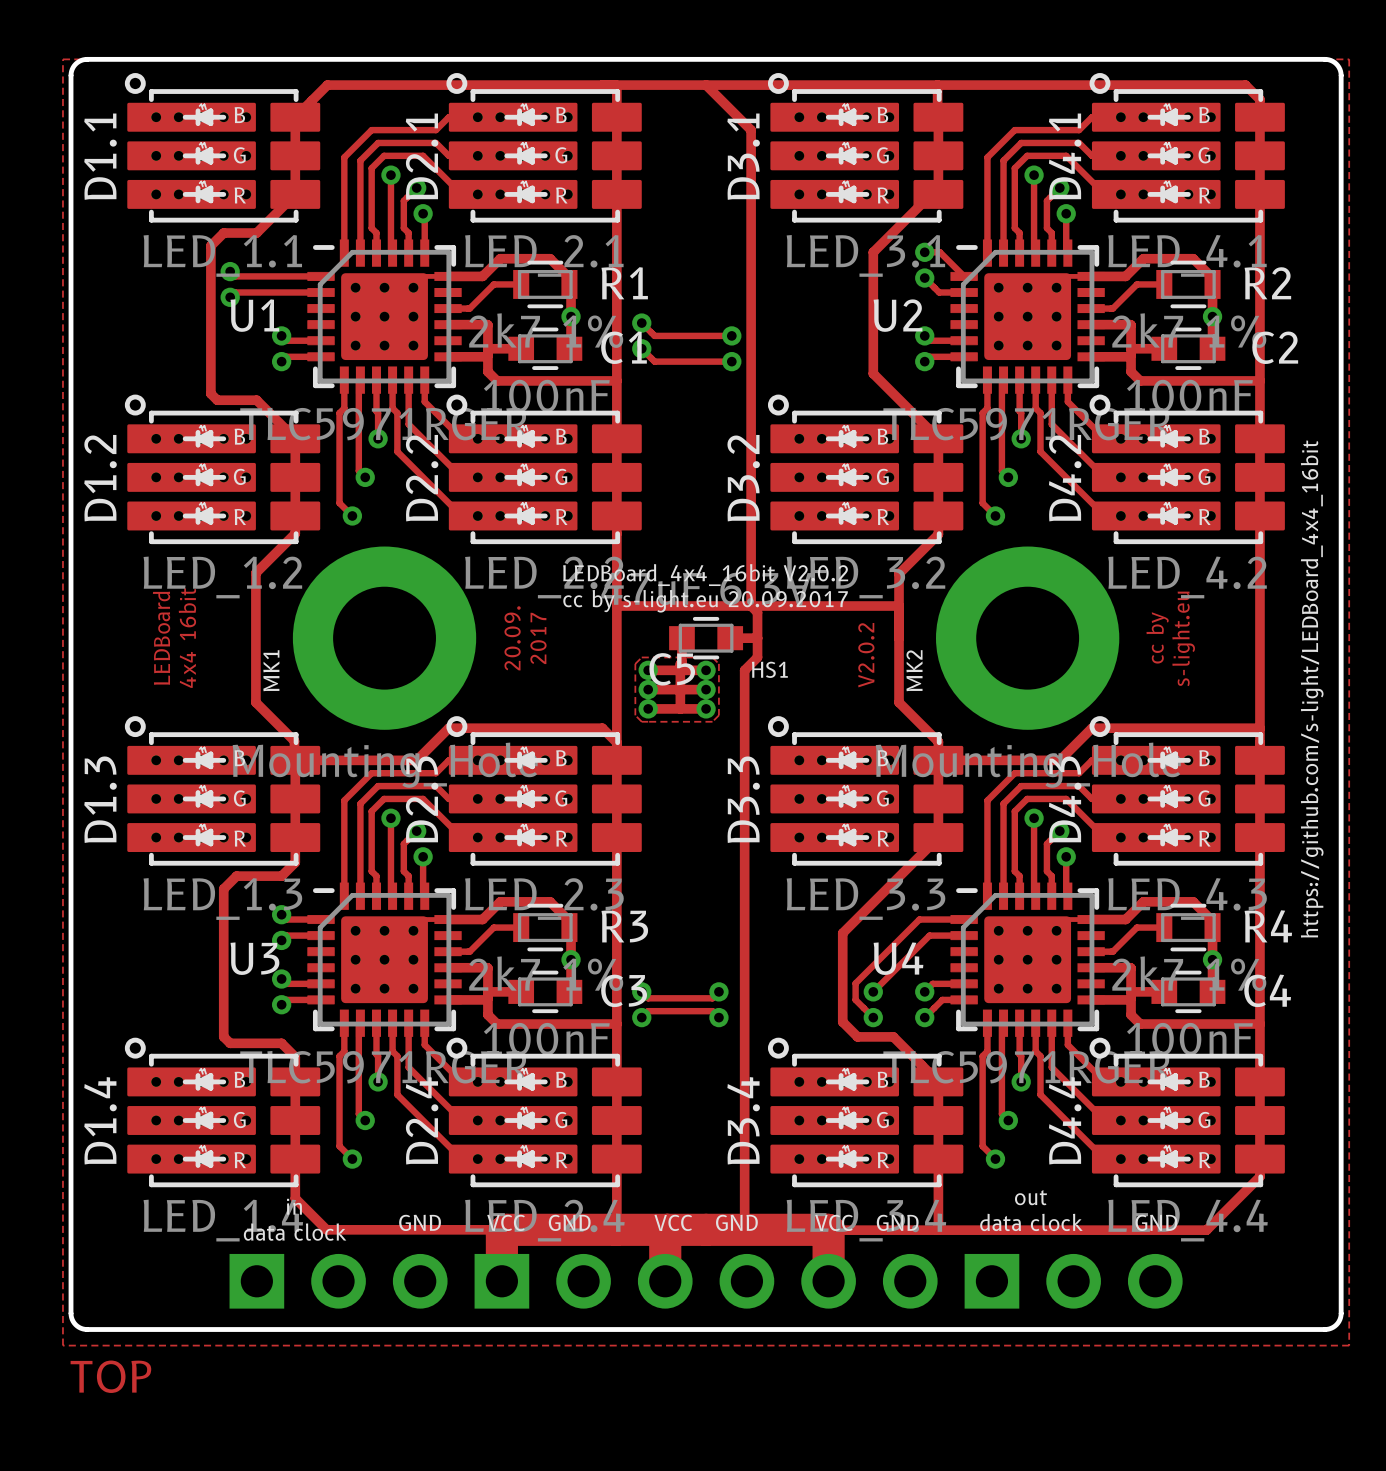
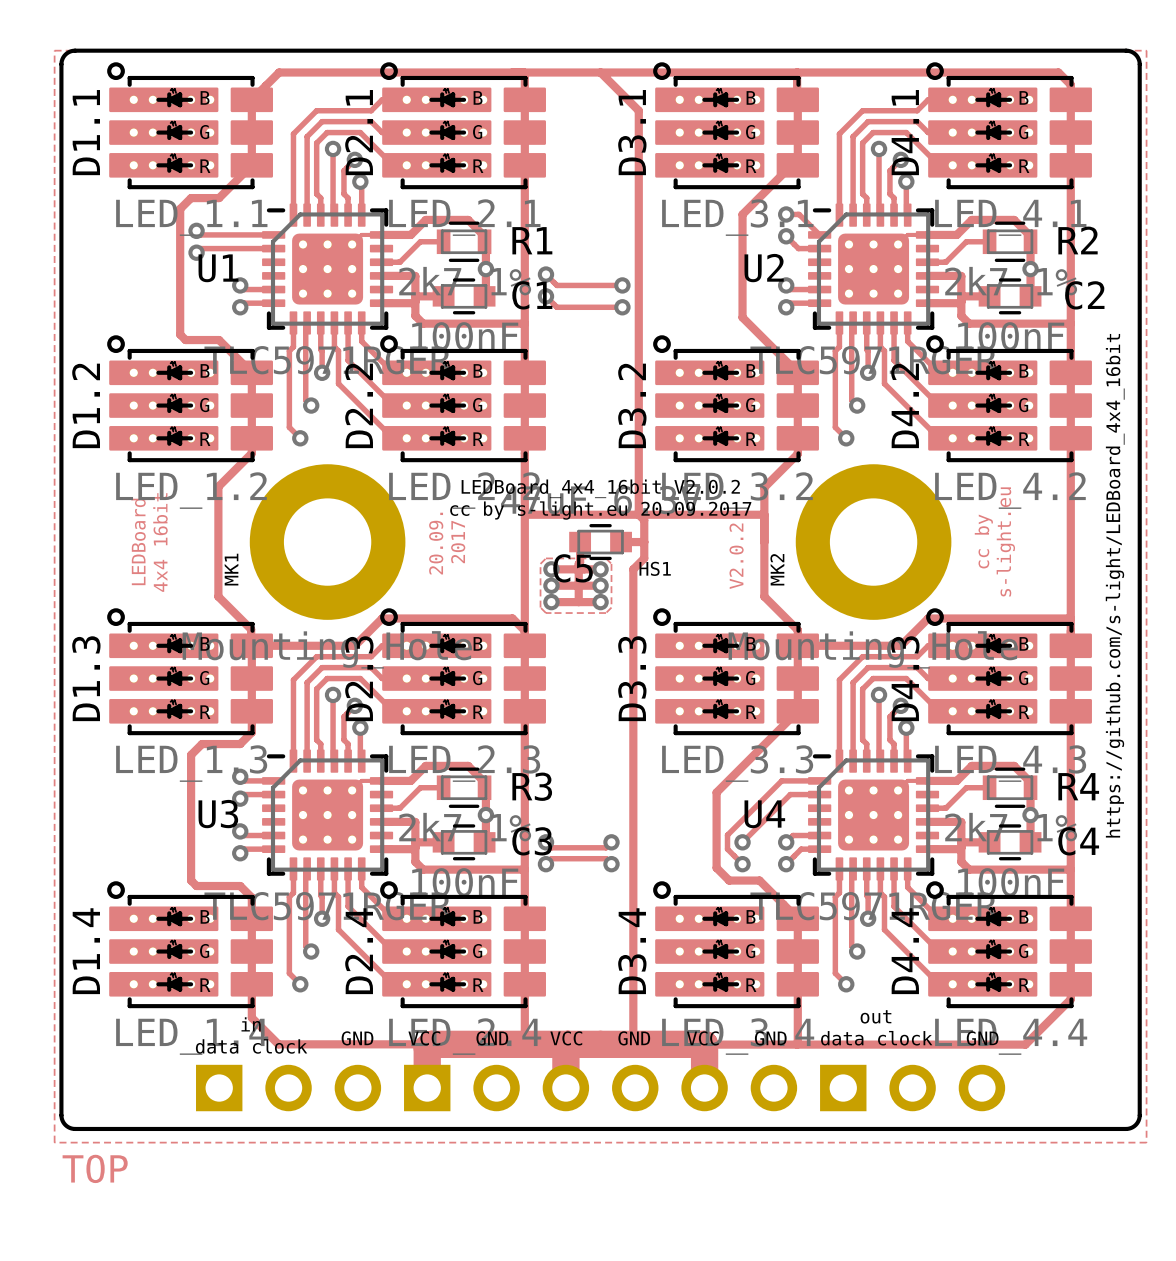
U1 footprint: [307, 239, 462, 394] -> [262, 203, 394, 335]
U2 footprint: [950, 239, 1105, 394] -> [808, 203, 940, 335]
U3 footprint: [307, 882, 462, 1037] -> [262, 749, 394, 881]
U4 footprint: [950, 882, 1105, 1037] -> [808, 749, 940, 881]

